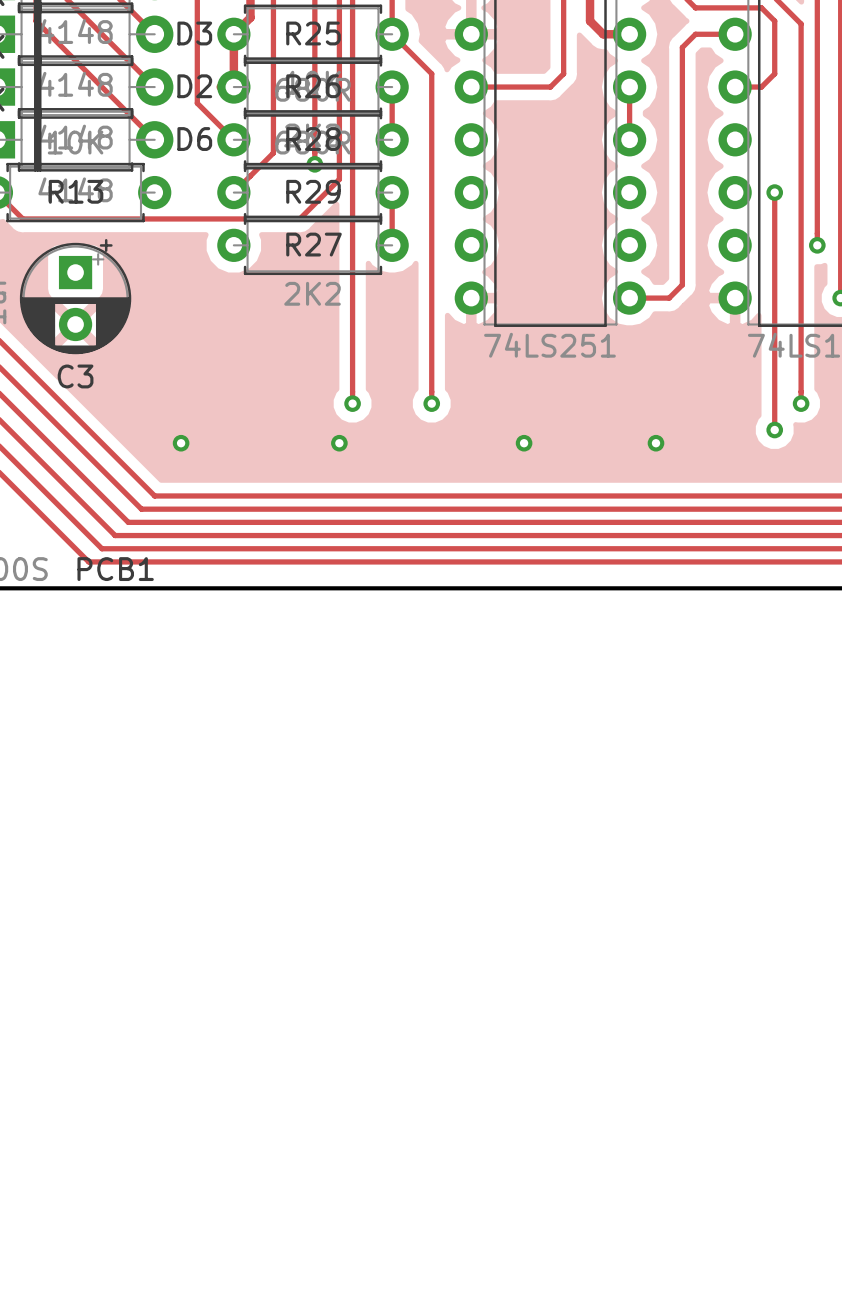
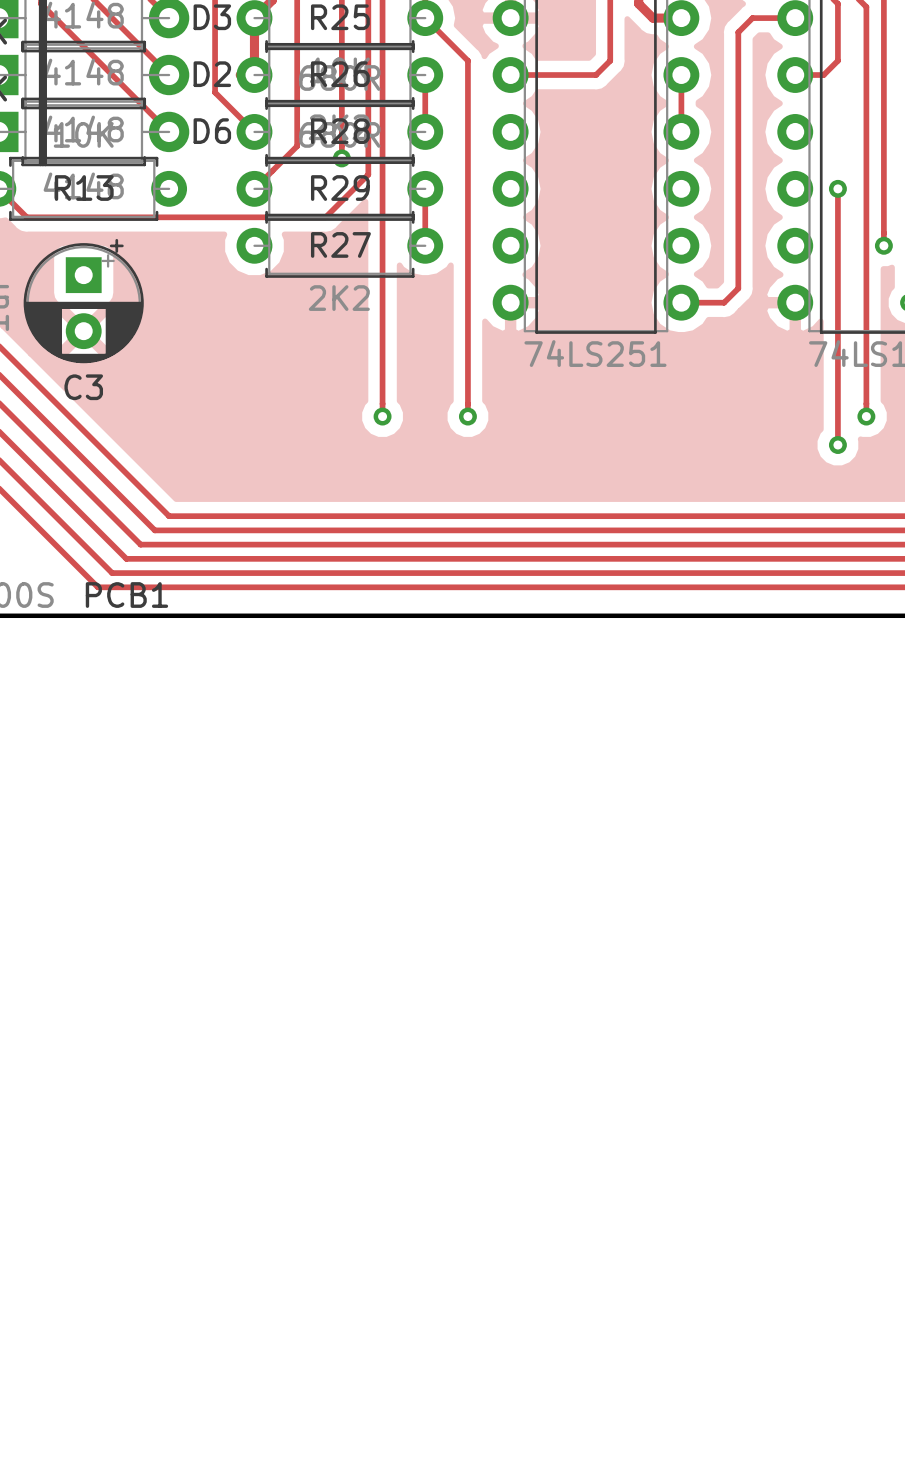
via: (181, 443) -> none
via: (339, 443) -> none
via: (524, 443) -> none
via: (655, 443) -> none

